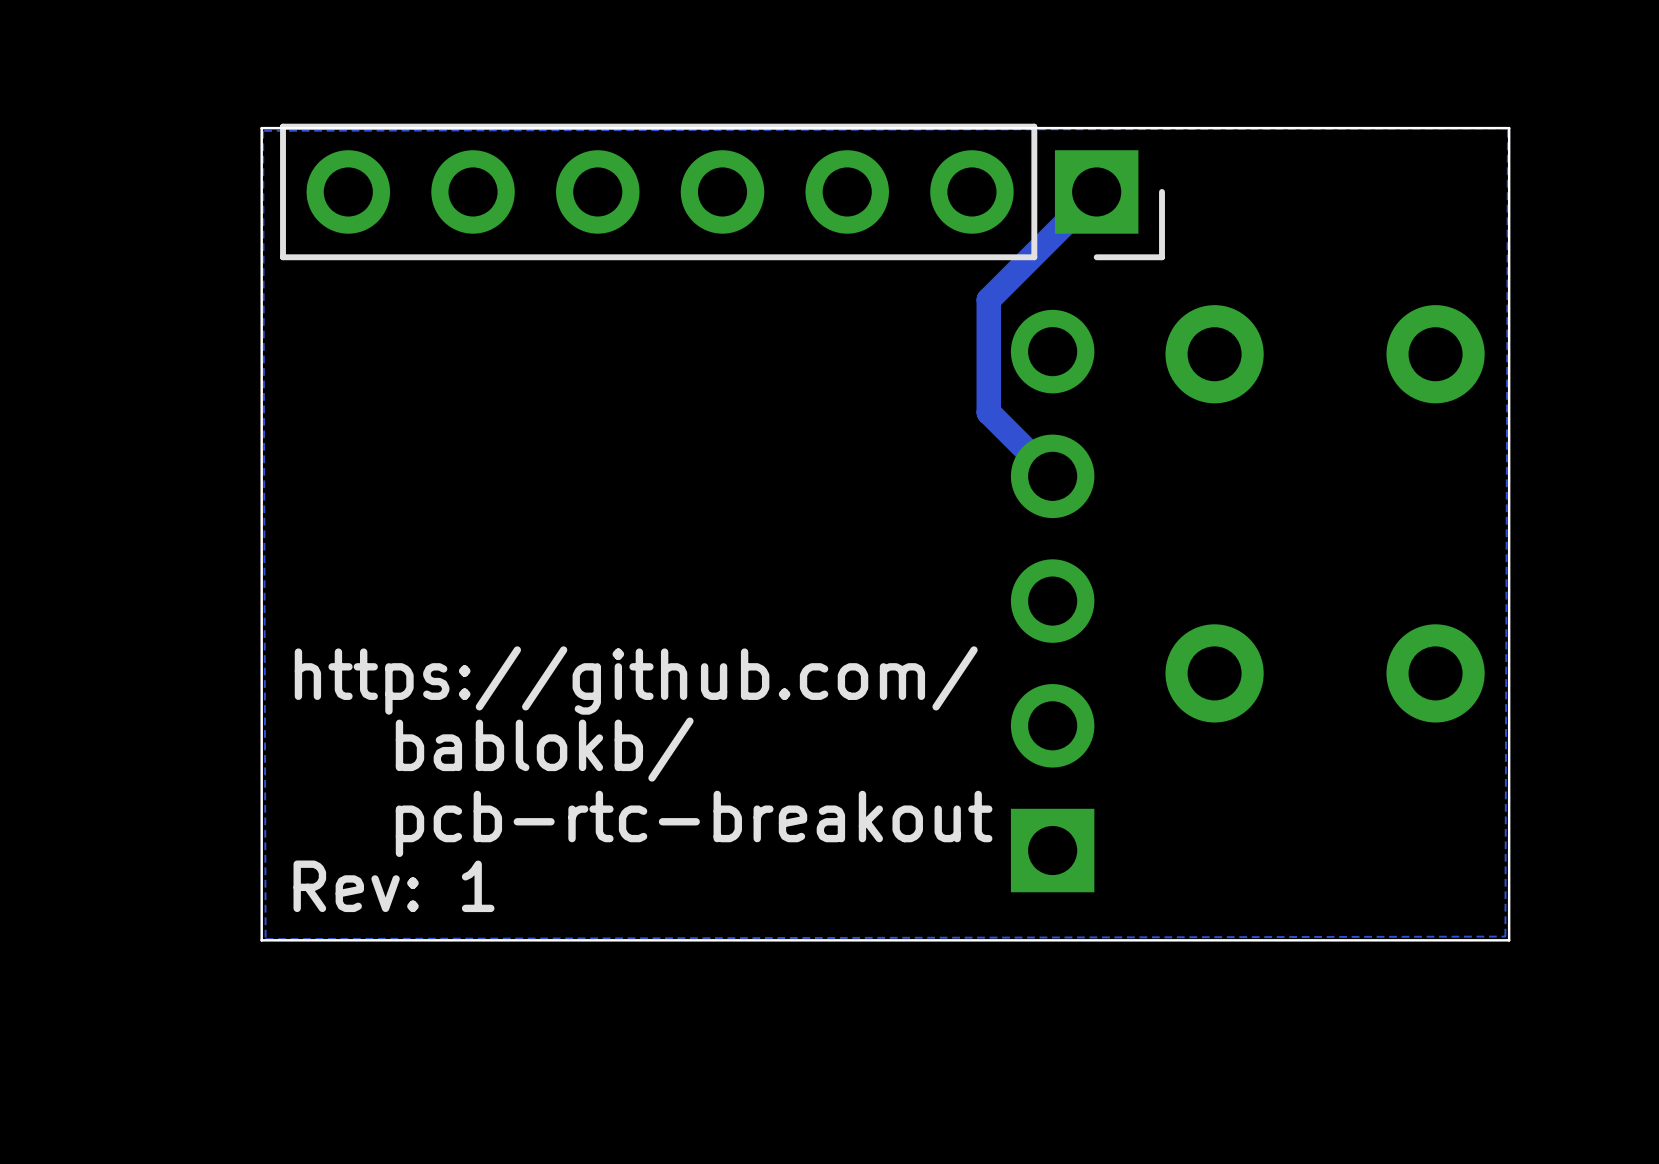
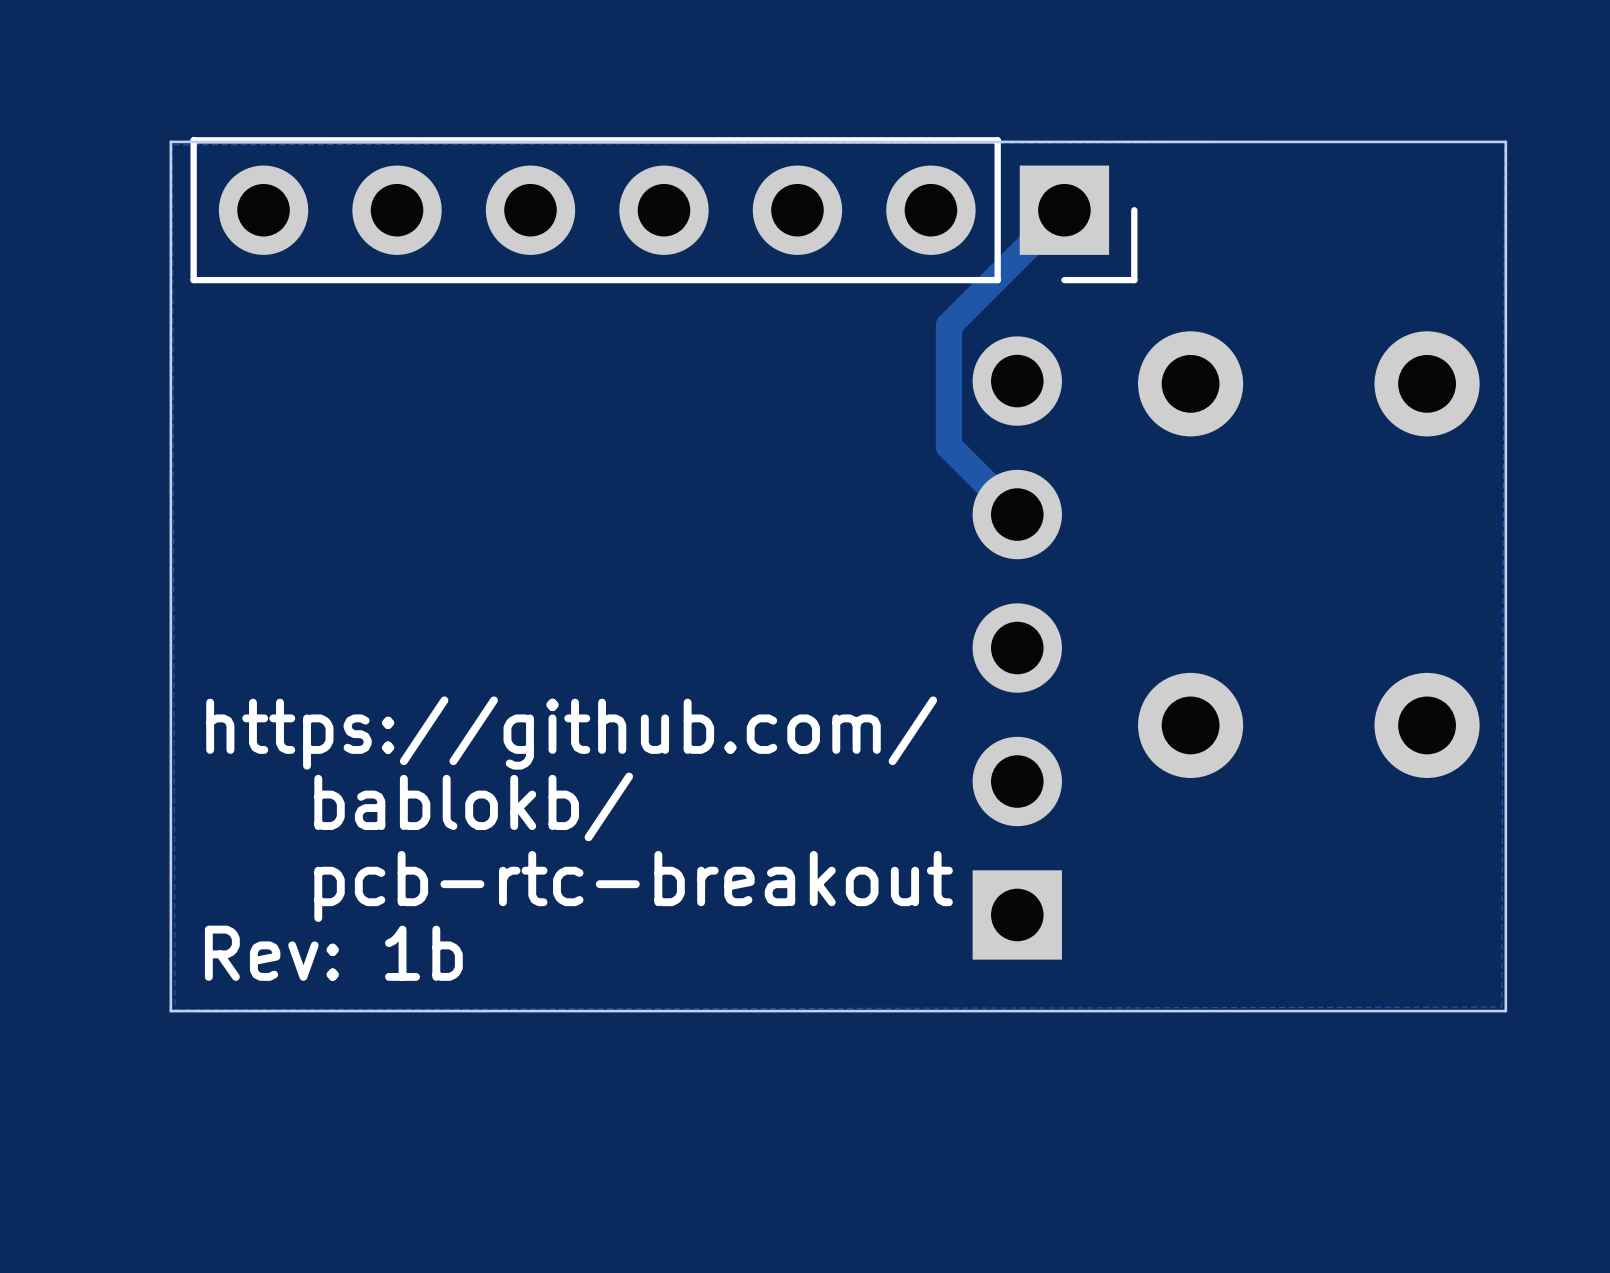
text: Rev: 1 (394, 886) -> Rev: 1b (333, 953)

